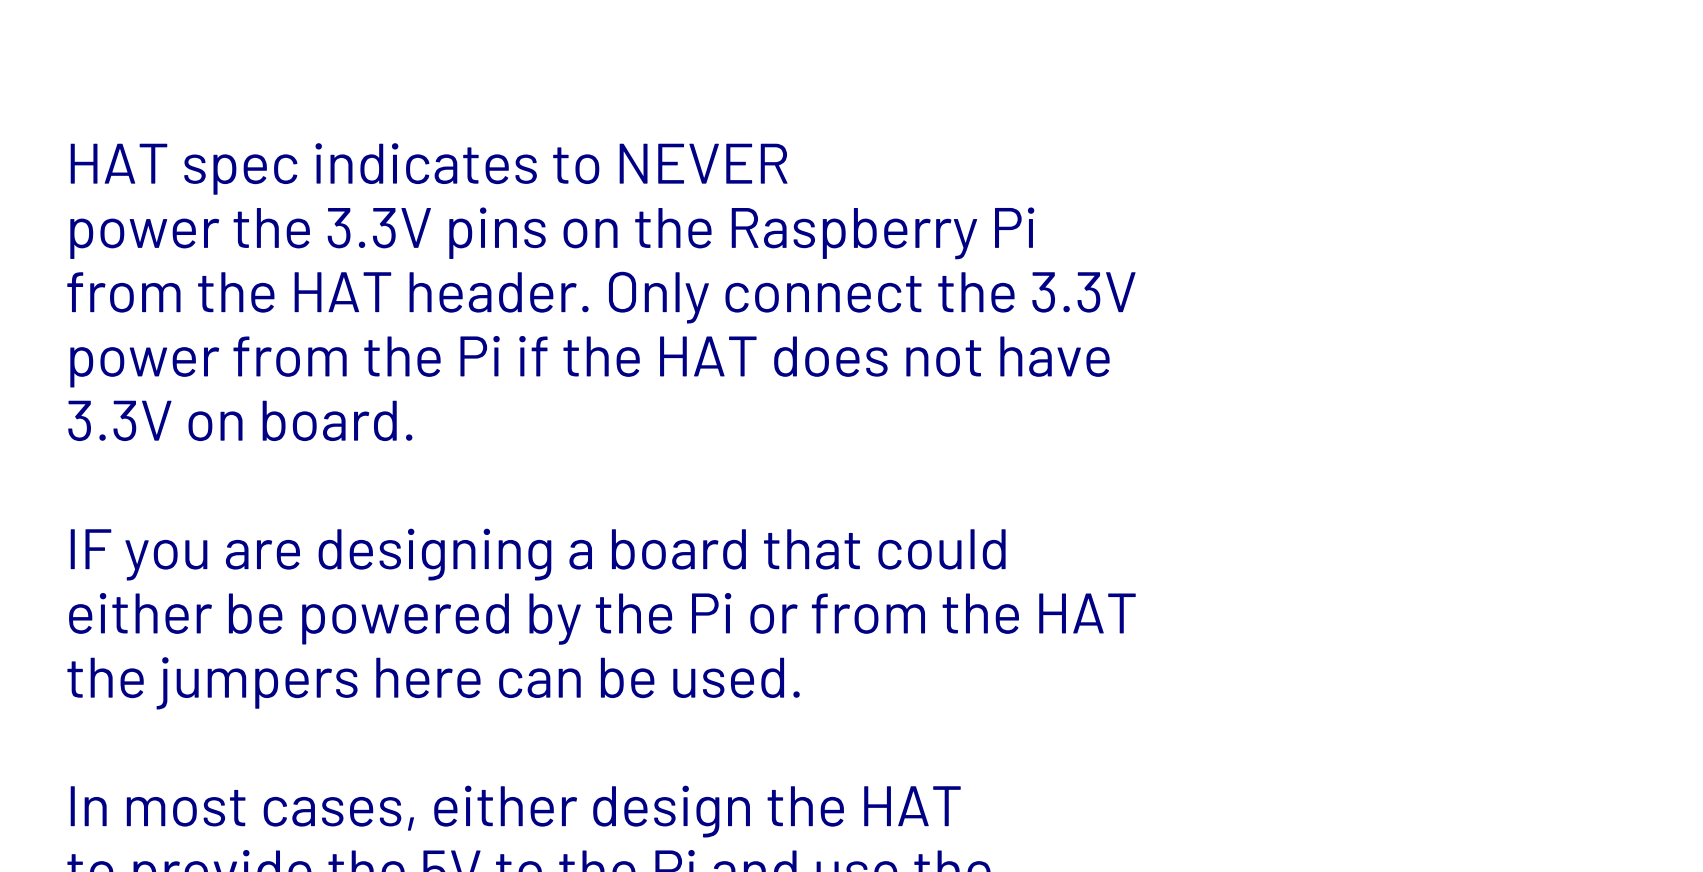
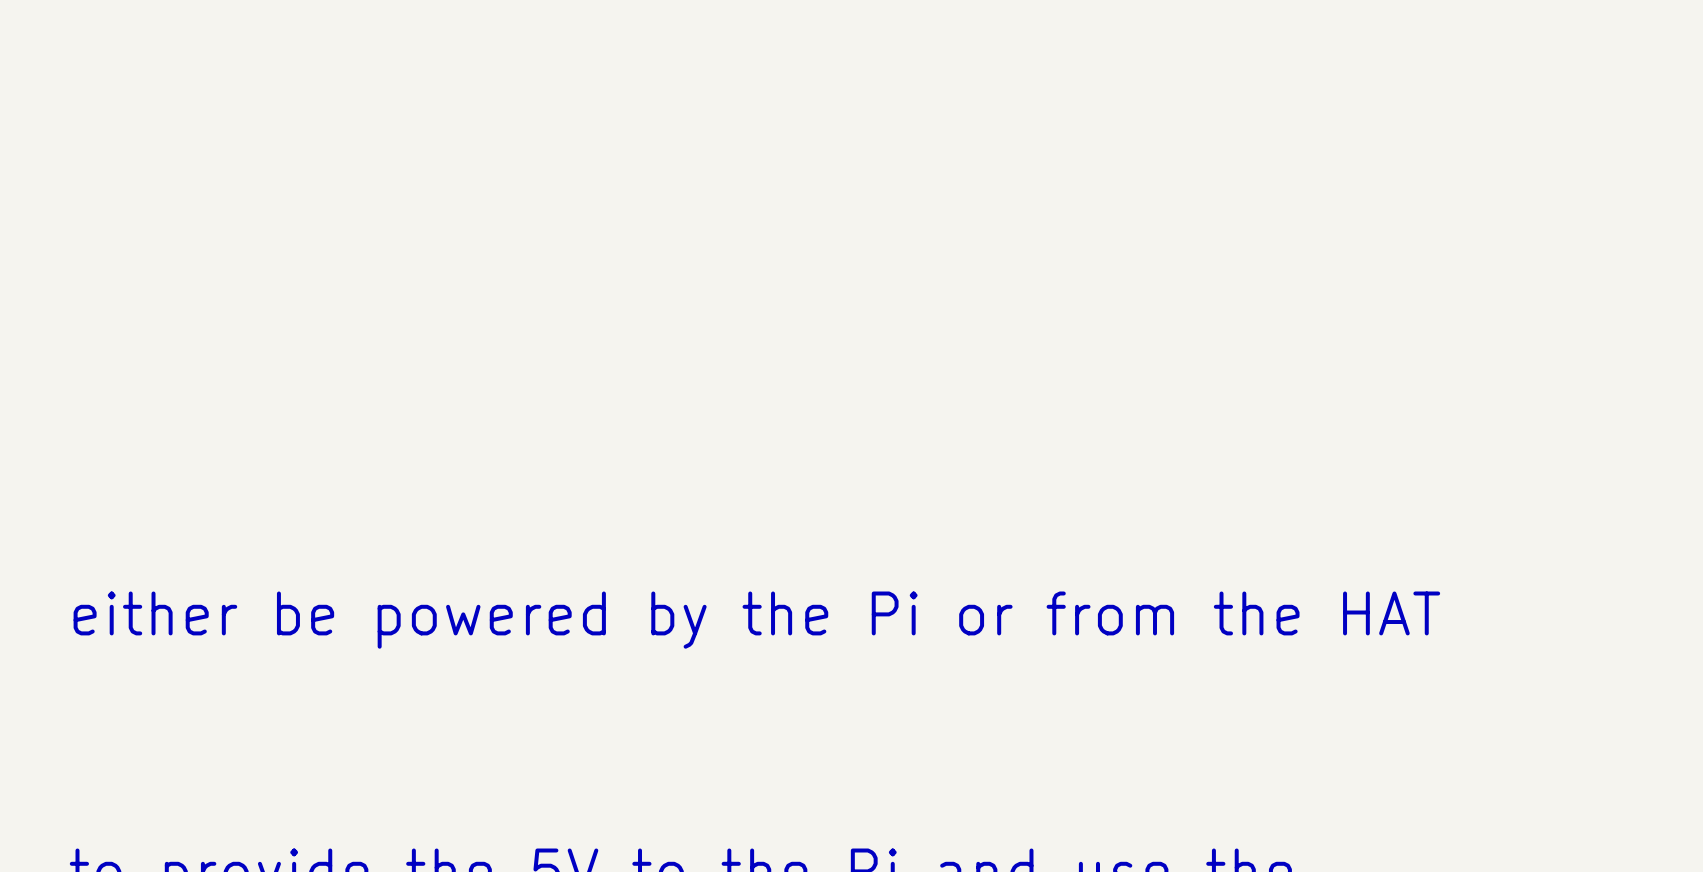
text: HAT spec indicates to NEVER (429, 168) -> none
text: power the 3.3V pins on the Raspberry Pi (552, 233) -> none
text: from the HAT header. Only connect the 3.3V (601, 297) -> none
text: power from the Pi if the HAT does not have (589, 361) -> none
text: 3.3V on board. (240, 420) -> none
text: IF you are designing a board that could (538, 554) -> none
text: the jumpers here can be used. (433, 683) -> none
text: In most cases, either design the HAT (515, 811) -> none

